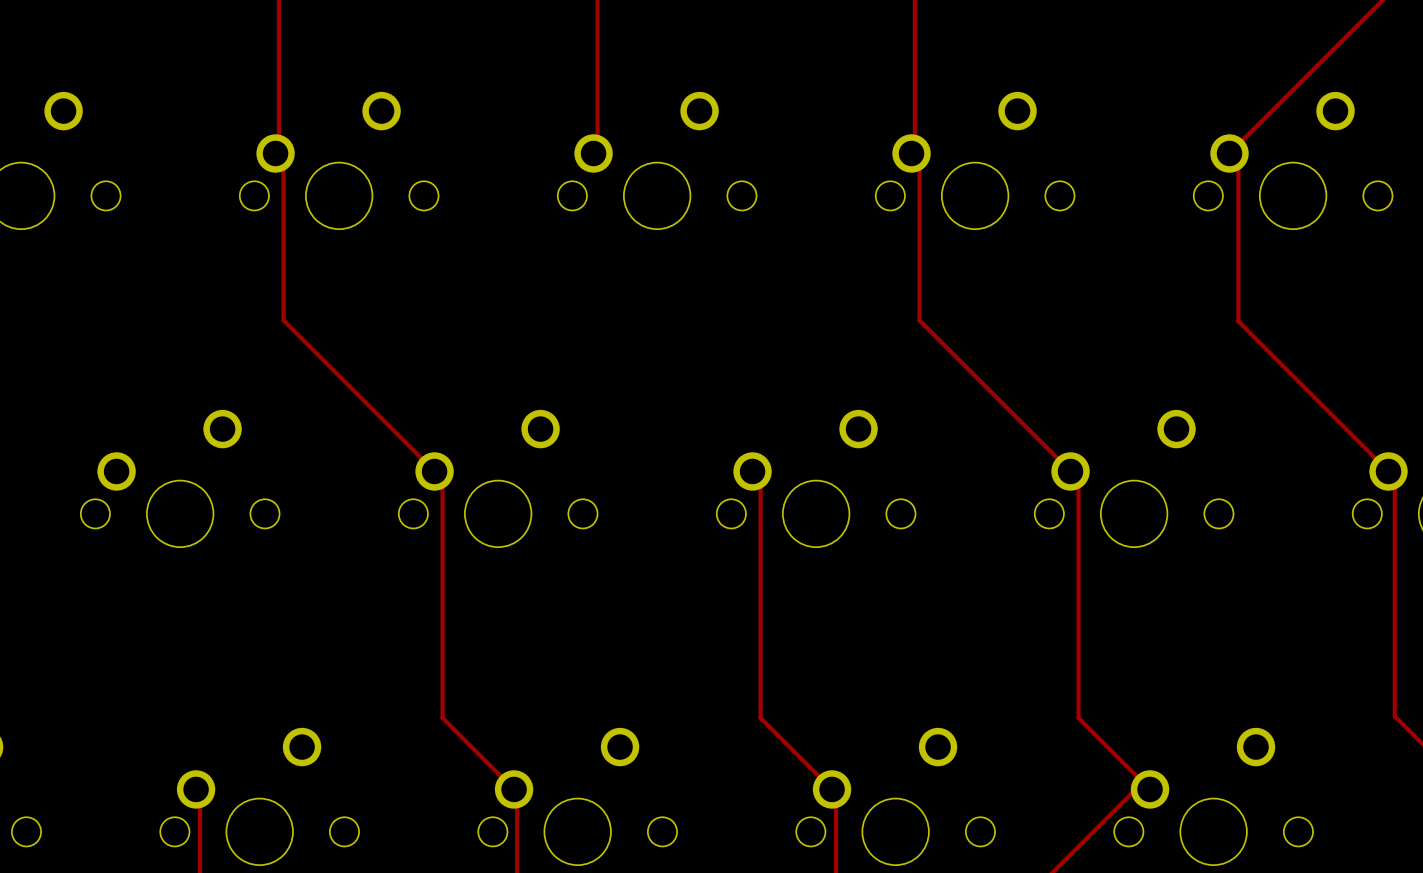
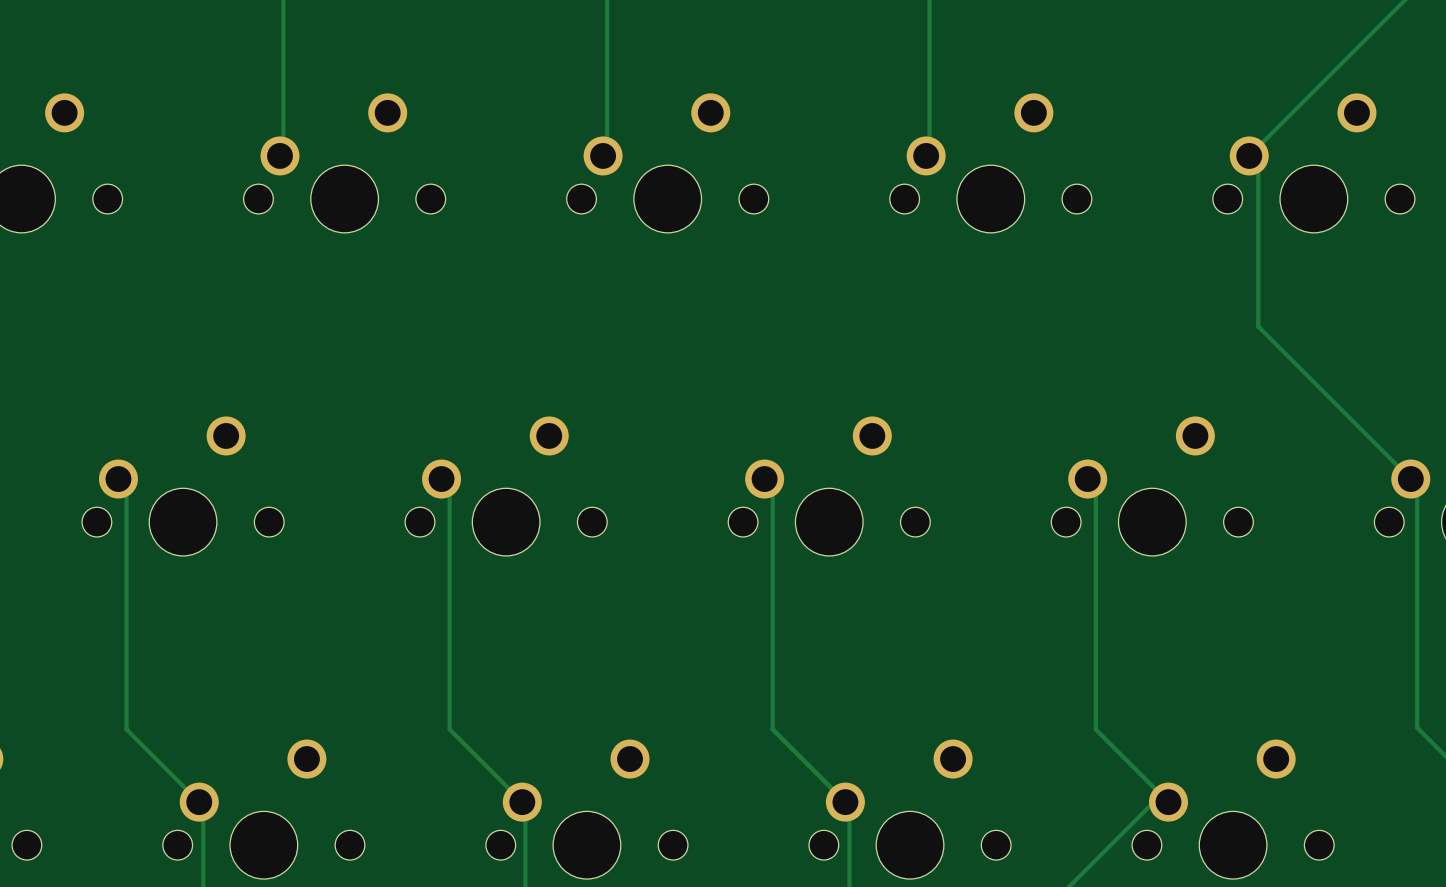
track: (275, 153) (283, 161) (283, 320) (434, 471) -> none
track: (911, 153) (919, 161) (919, 320) (1070, 471) -> none
track: none -> (118, 479) (126, 487) (126, 729) (199, 802)

